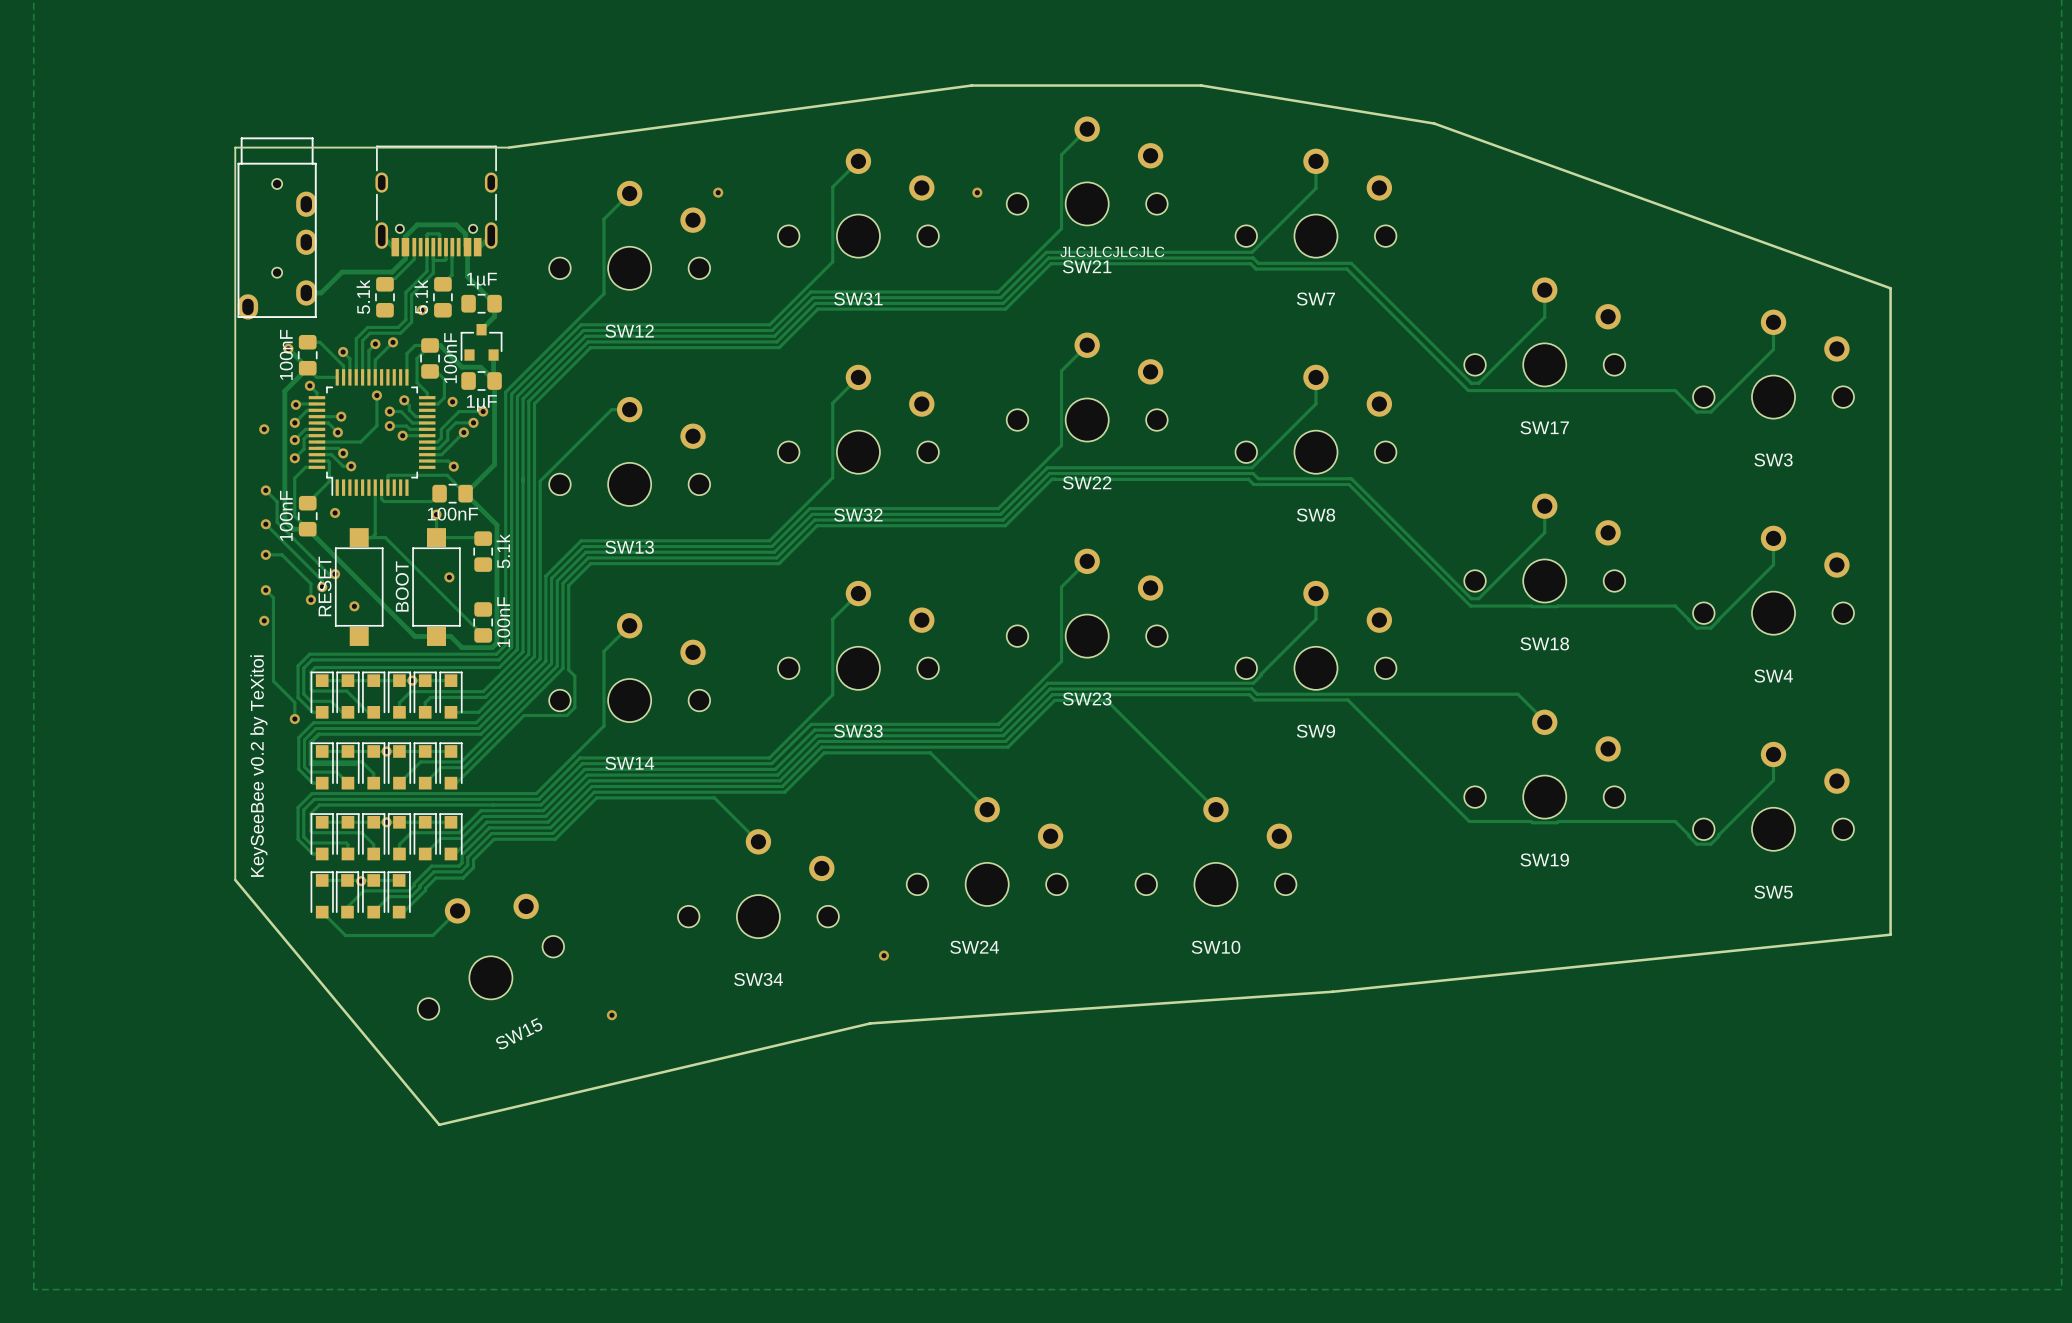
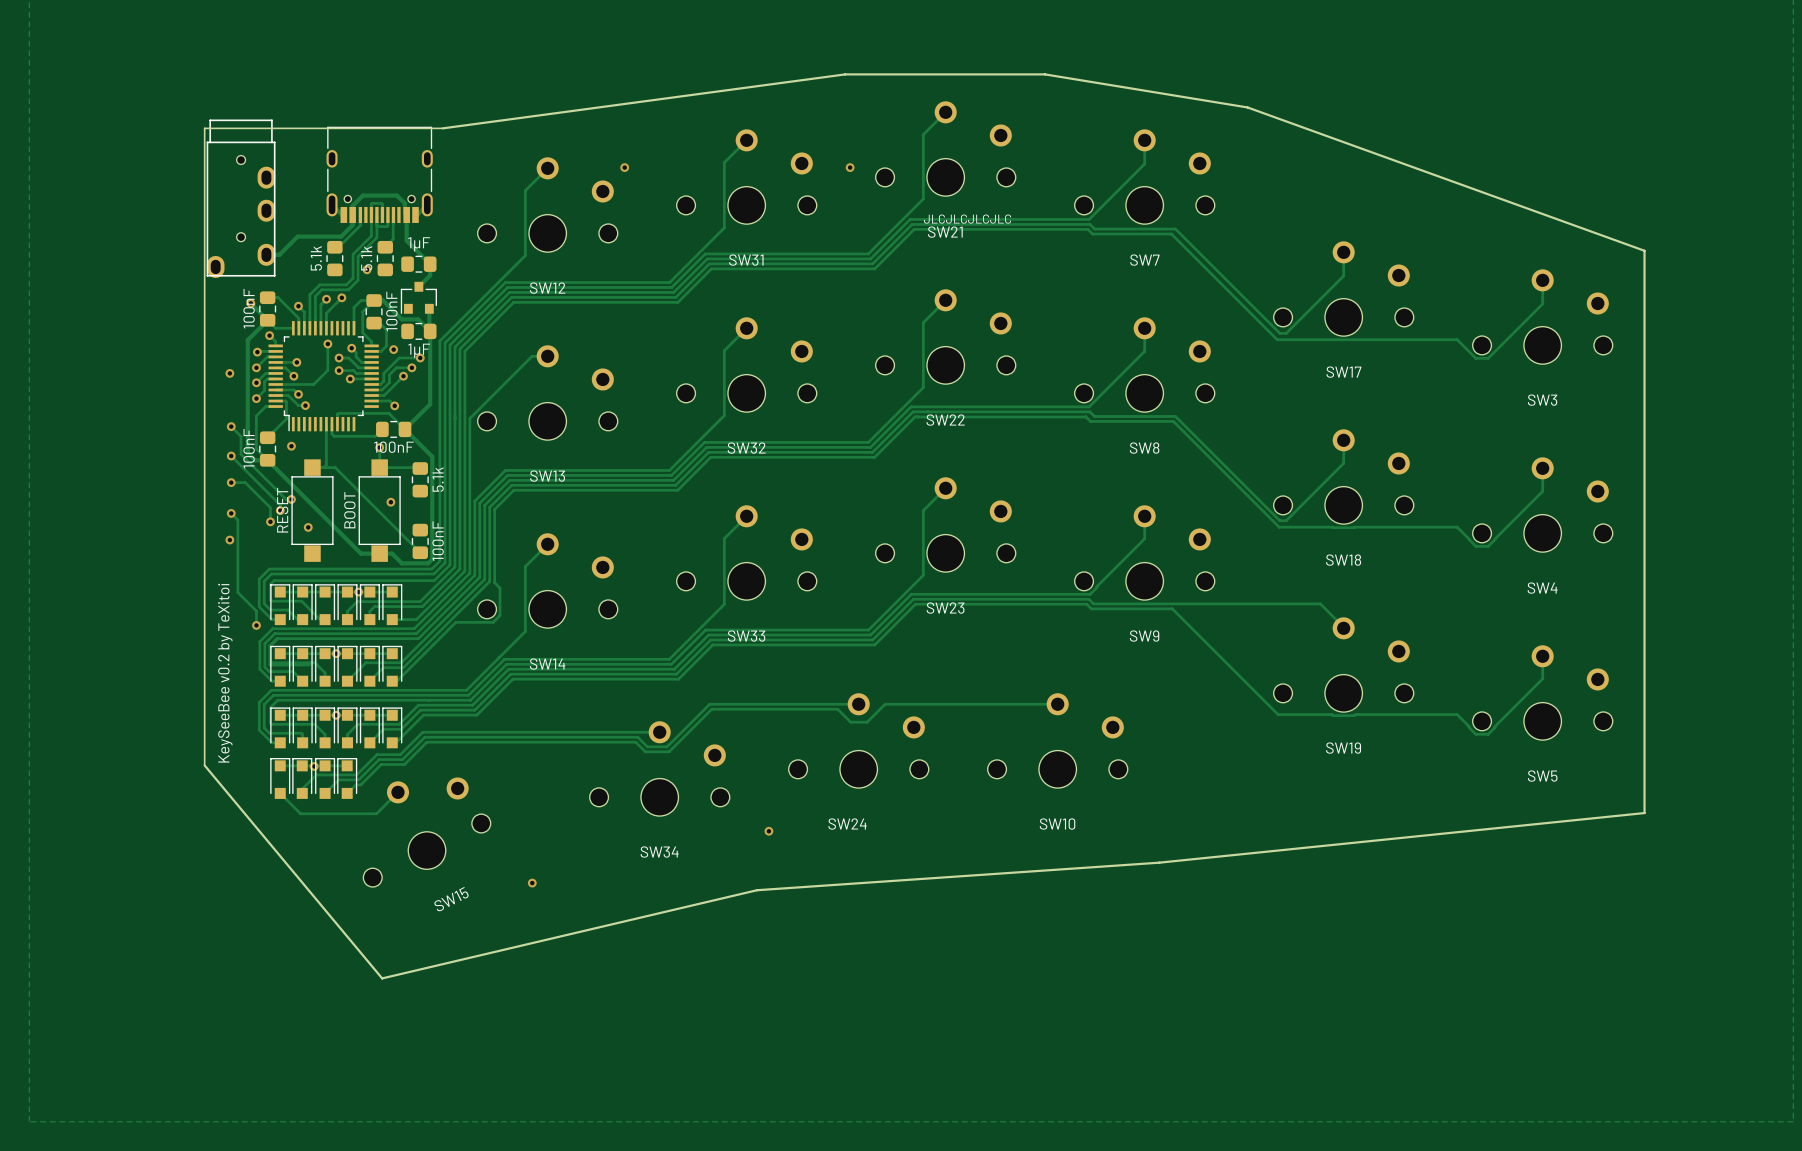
track: (987, 809) (930, 752) (824, 752) (784, 792) (594, 792) (552, 833) (491, 833) (467, 857) (467, 865) (461, 871) (434, 871) (411, 896) -> (858, 704) (709, 704) (667, 746) (647, 746) (637, 737) (424, 737) (402, 759) (379, 759) (357, 779)
track: (1215, 809) (1106, 700) (1054, 700) (1008, 747) (821, 747) (782, 786) (591, 786) (550, 827) (489, 827) (462, 855) (462, 862) (458, 866) (431, 866) (408, 890) -> (1057, 704) (885, 704) (867, 722) (850, 722) (837, 709) (711, 709) (669, 751) (645, 751) (635, 742) (426, 742) (404, 764) (381, 764) (360, 784) (356, 784) (347, 793)
track: (758, 841) (714, 797) (596, 797) (555, 839) (494, 839) (473, 859) (473, 867) (463, 878) (435, 878) (403, 912) (399, 912) -> (659, 732) (422, 732) (400, 754) (377, 754) (355, 774)

